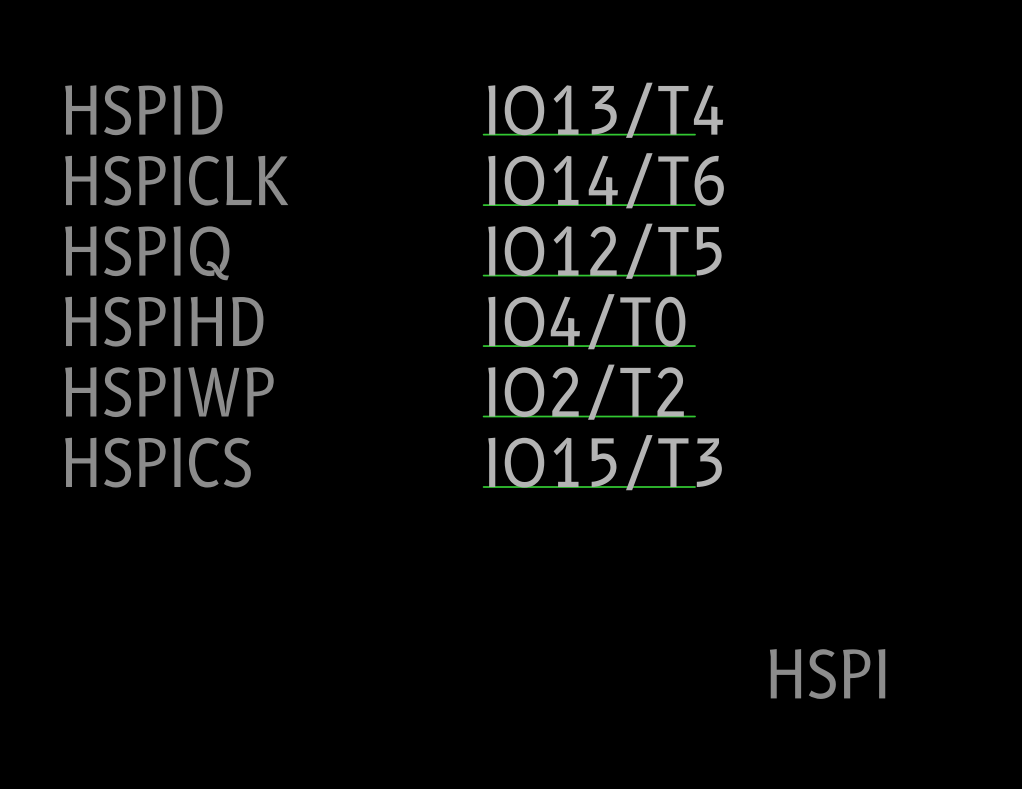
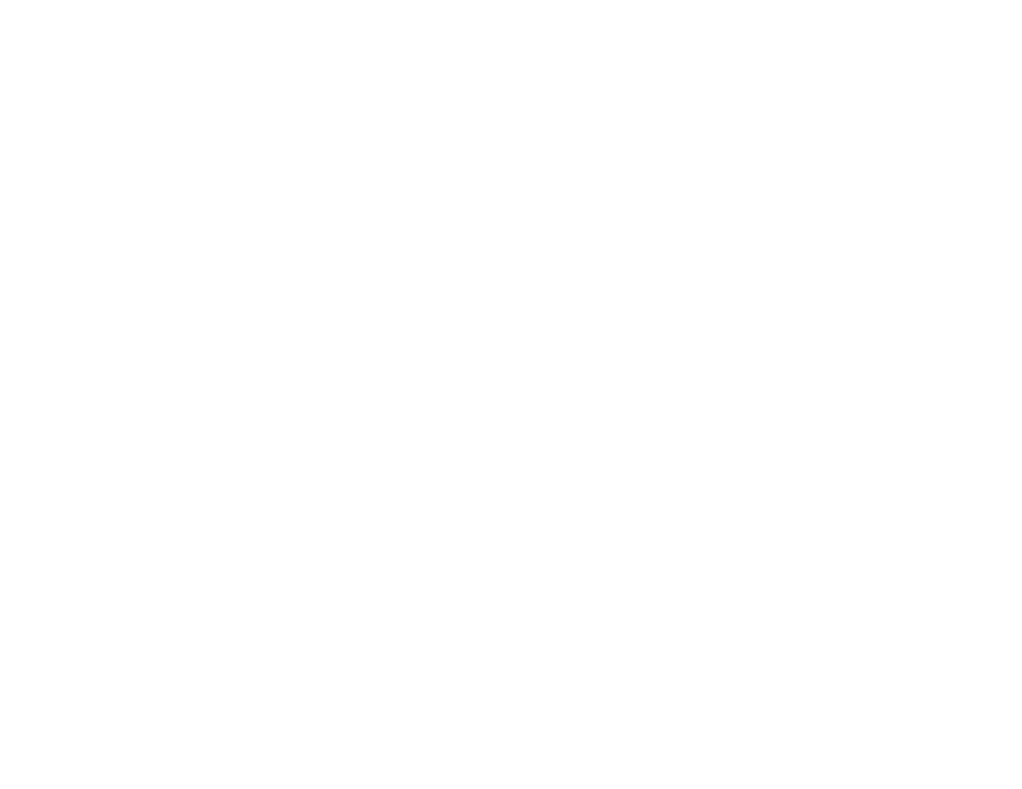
text: HSPID (143, 110) -> none
label: IO13/T4 (605, 110) -> none
wire: (483, 134) (695, 134) -> none
text: HSPICLK (176, 180) -> none
label: IO14/T6 (606, 180) -> none
wire: (483, 205) (695, 205) -> none
label: IO12/T5 (604, 251) -> none
text: HSPIQ (147, 253) -> none
wire: (483, 275) (695, 275) -> none
text: HSPIHD (164, 321) -> none
label: IO4/T0 (586, 321) -> none
wire: (483, 346) (695, 346) -> none
text: HSPIWP (169, 392) -> none
label: IO2/T2 (586, 392) -> none
wire: (483, 416) (695, 416) -> none
text: HSPICS (158, 462) -> none
label: IO15/T3 (605, 462) -> none
wire: (483, 487) (695, 487) -> none
text: HSPI (827, 674) -> none

